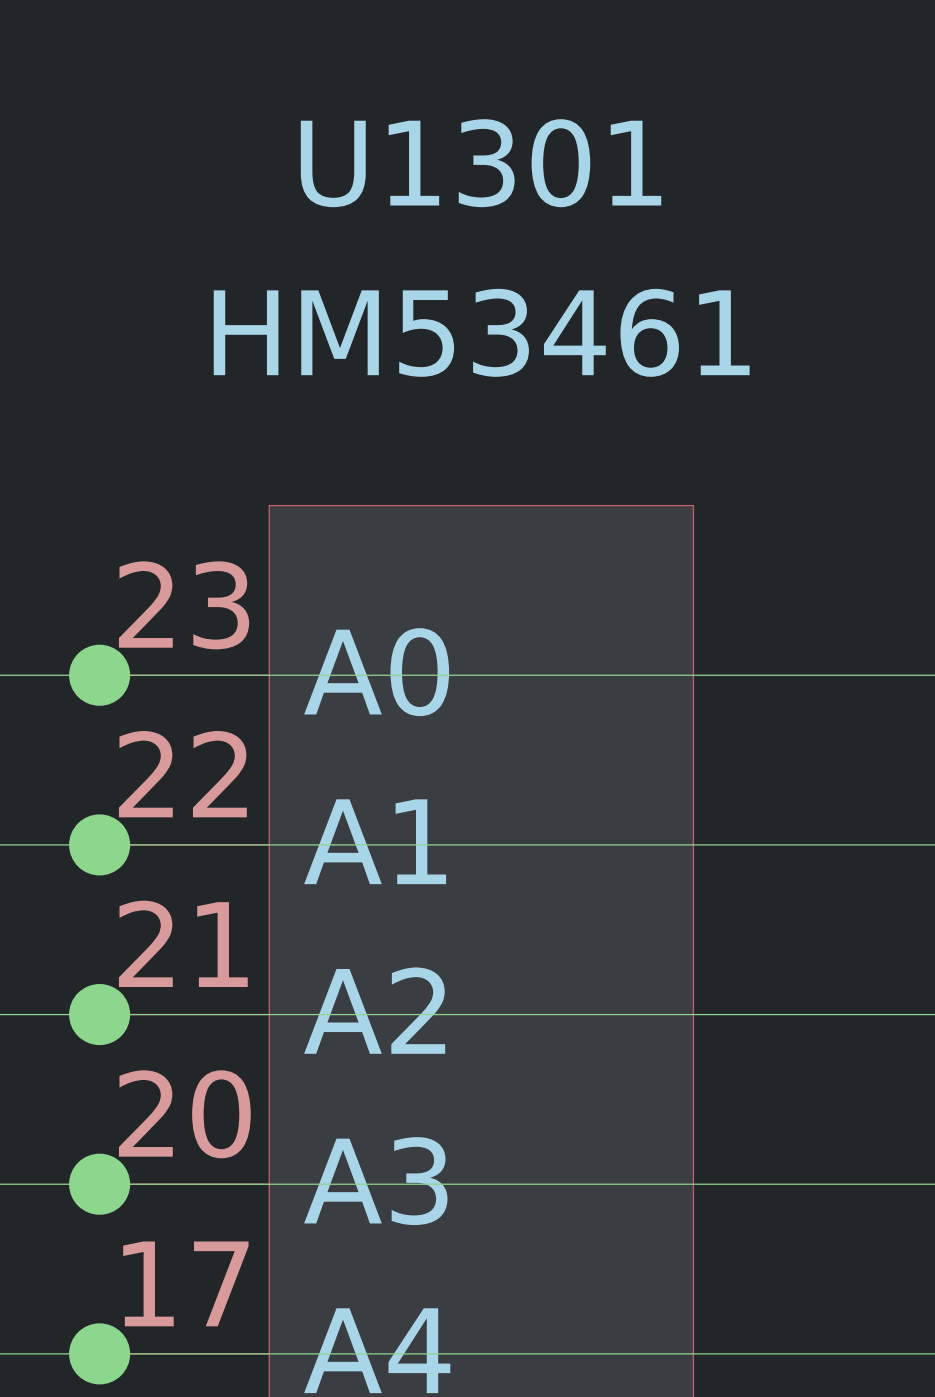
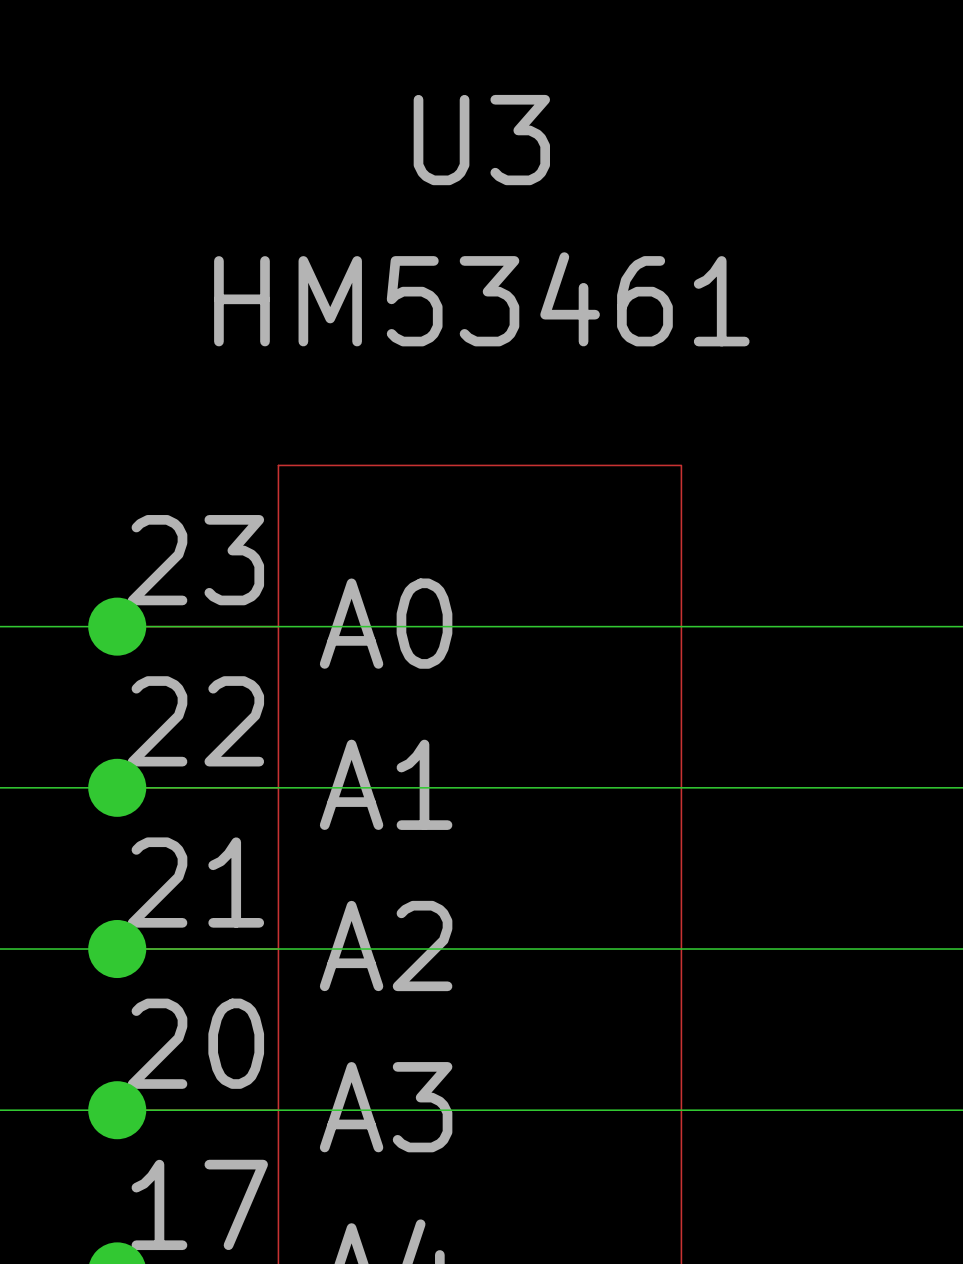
U1301 name: U1301 (481, 163) -> U3 (481, 140)

